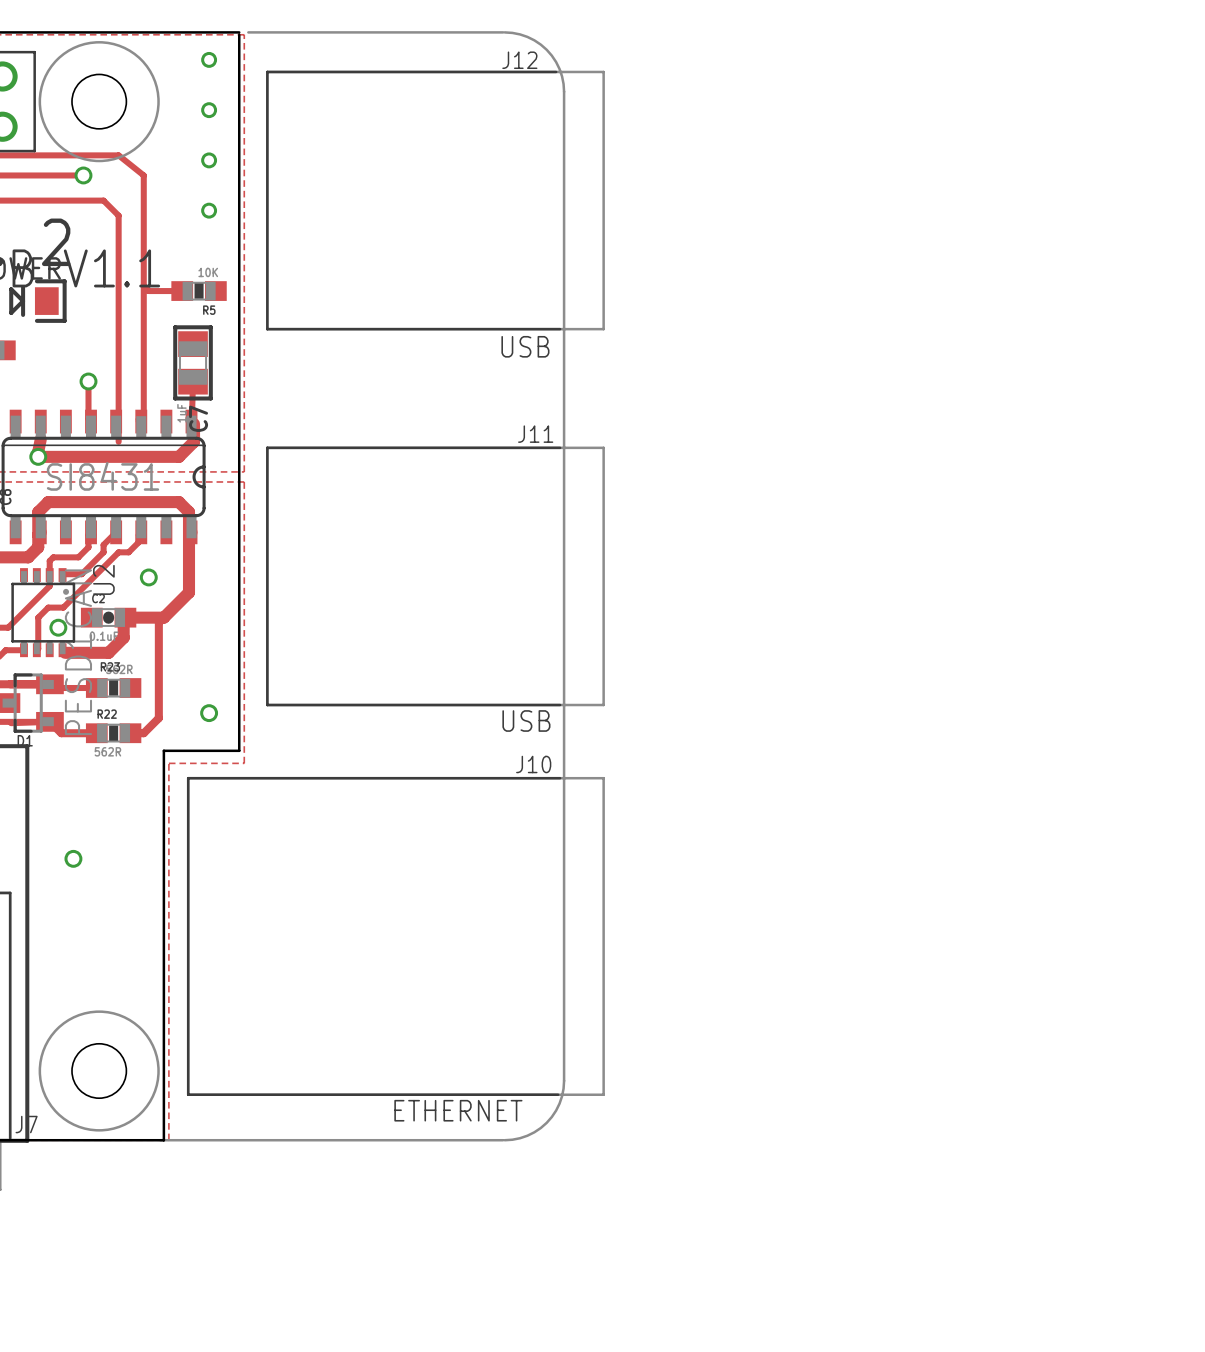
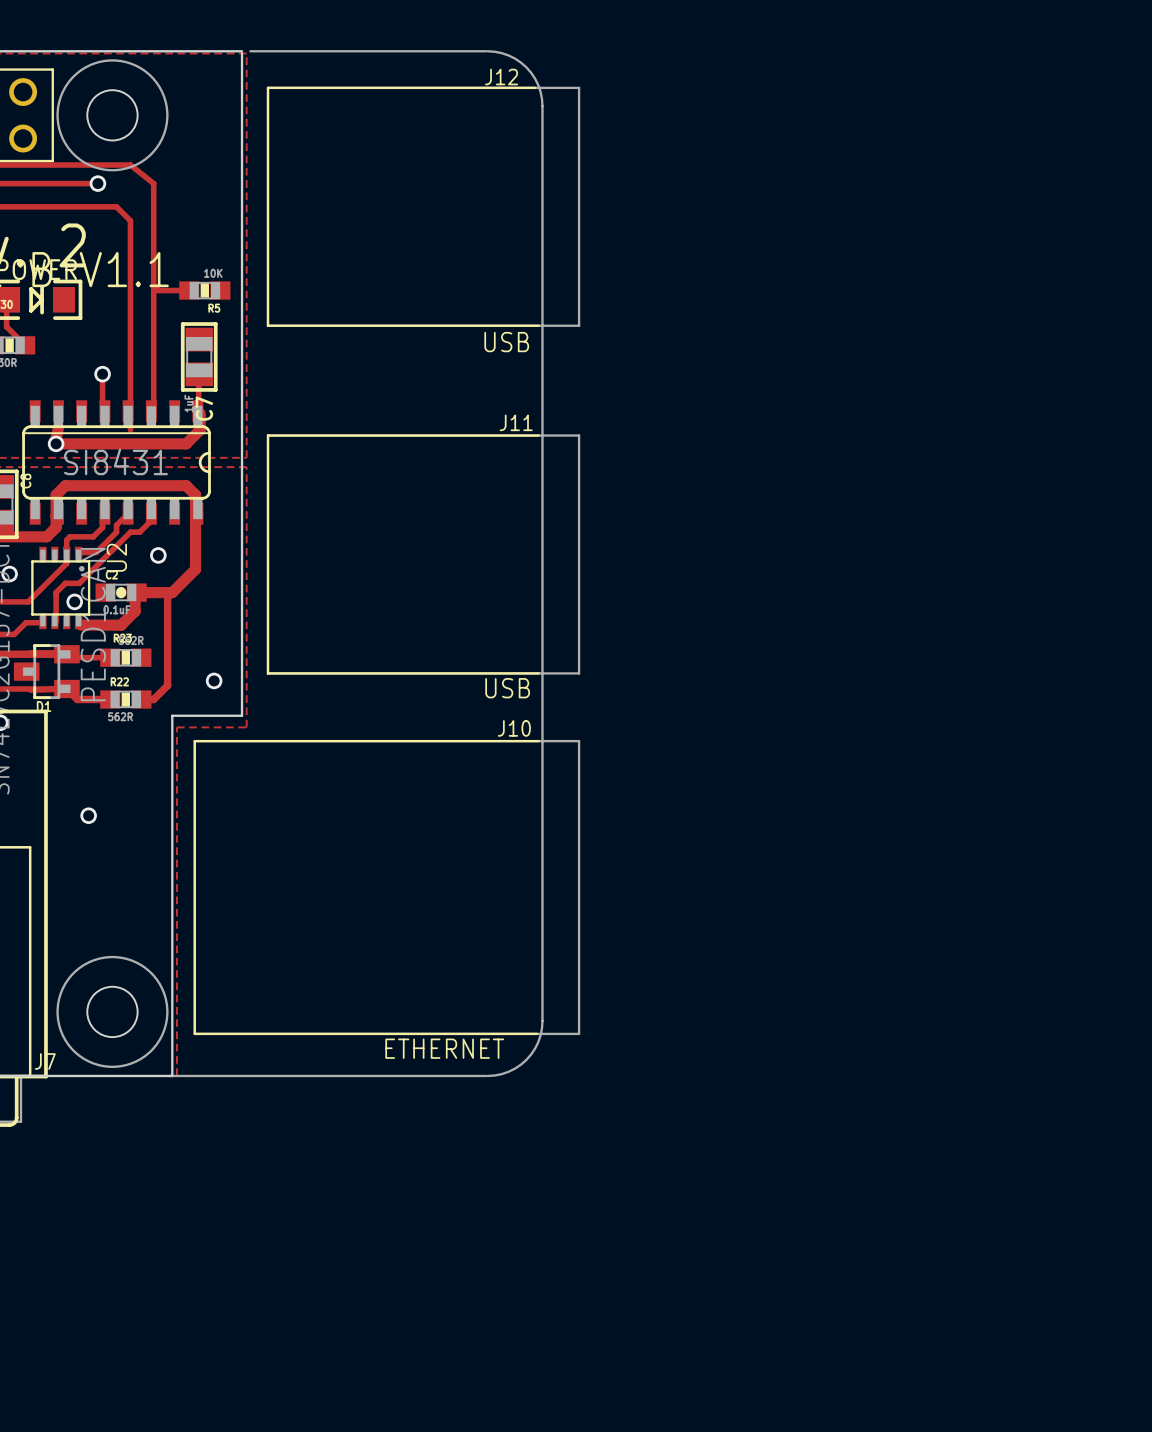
via: (209, 59) -> none
via: (209, 110) -> none
via: (209, 160) -> none
via: (209, 210) -> none

